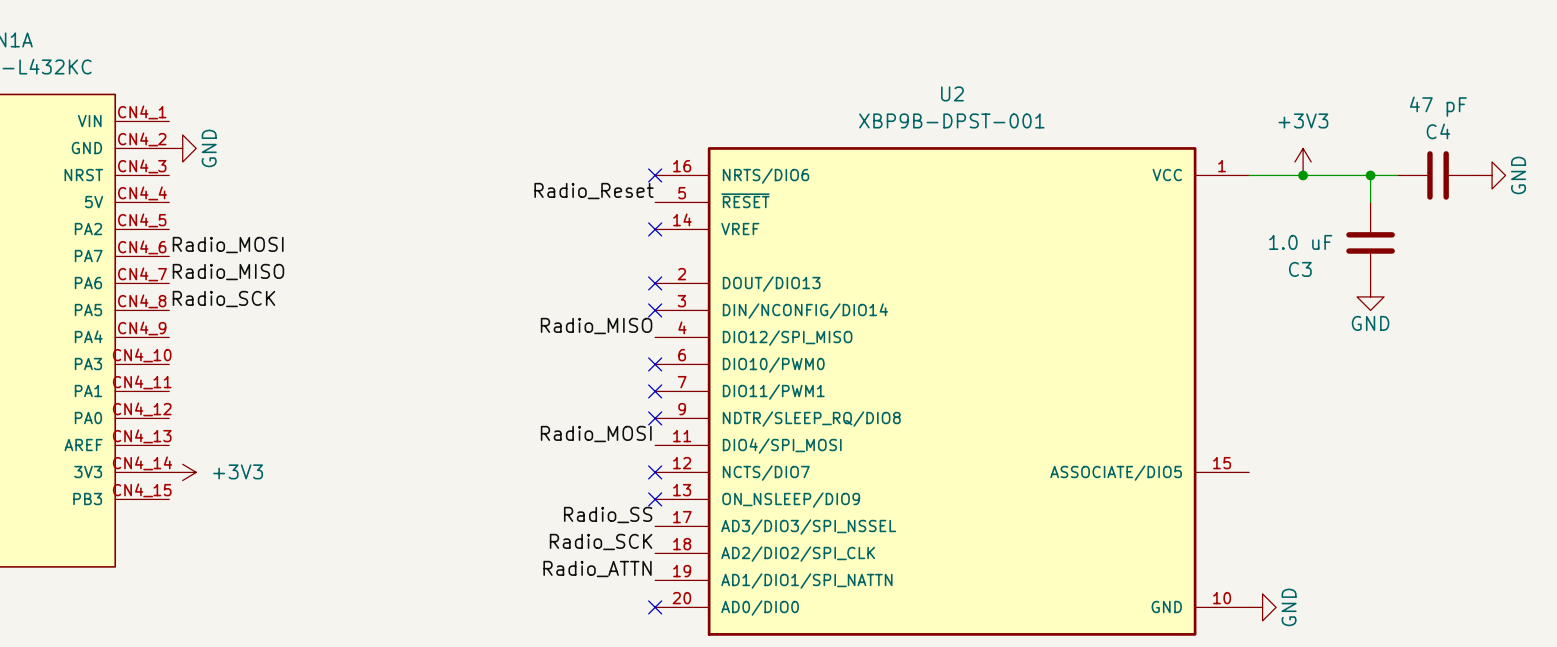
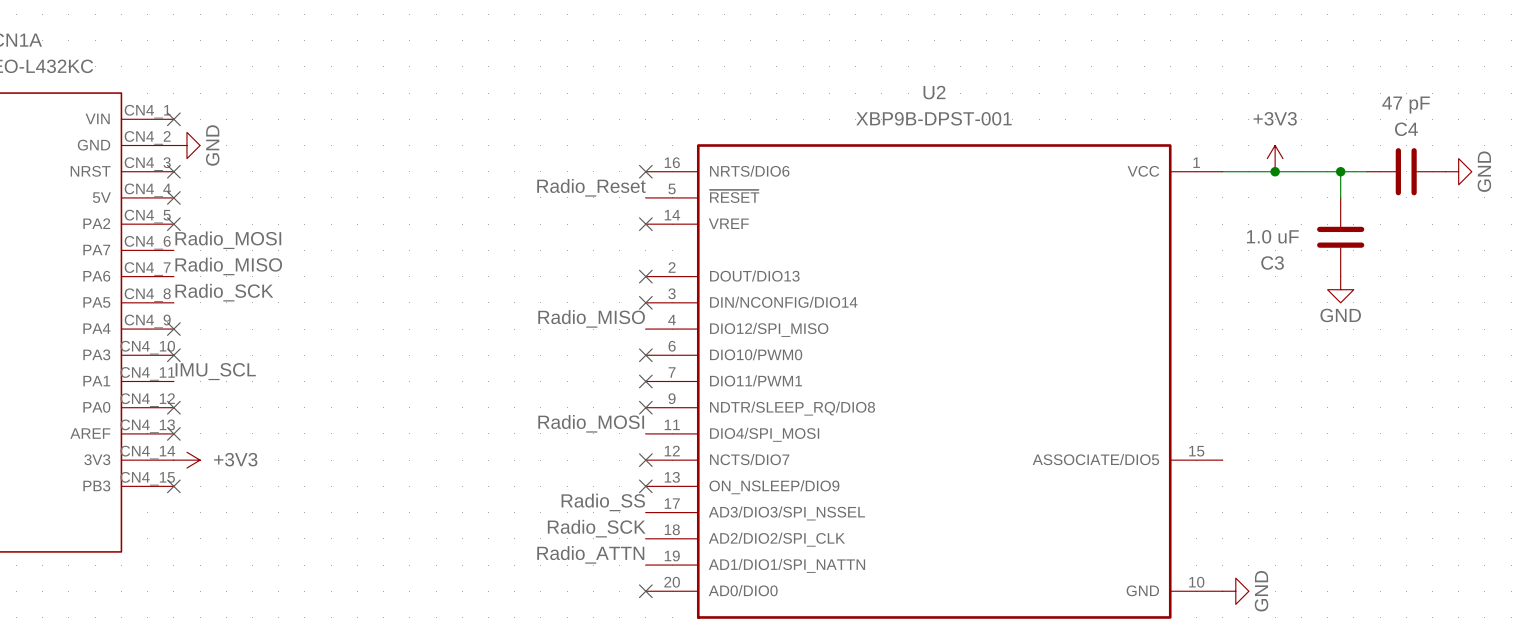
no-connect mark: none -> (173, 119)
no-connect mark: none -> (173, 171)
no-connect mark: none -> (173, 197)
no-connect mark: none -> (173, 224)
no-connect mark: none -> (173, 329)
no-connect mark: none -> (173, 355)
label: none -> IMU_SCL (215, 371)
no-connect mark: none -> (173, 407)
no-connect mark: none -> (173, 433)
no-connect mark: none -> (173, 486)

